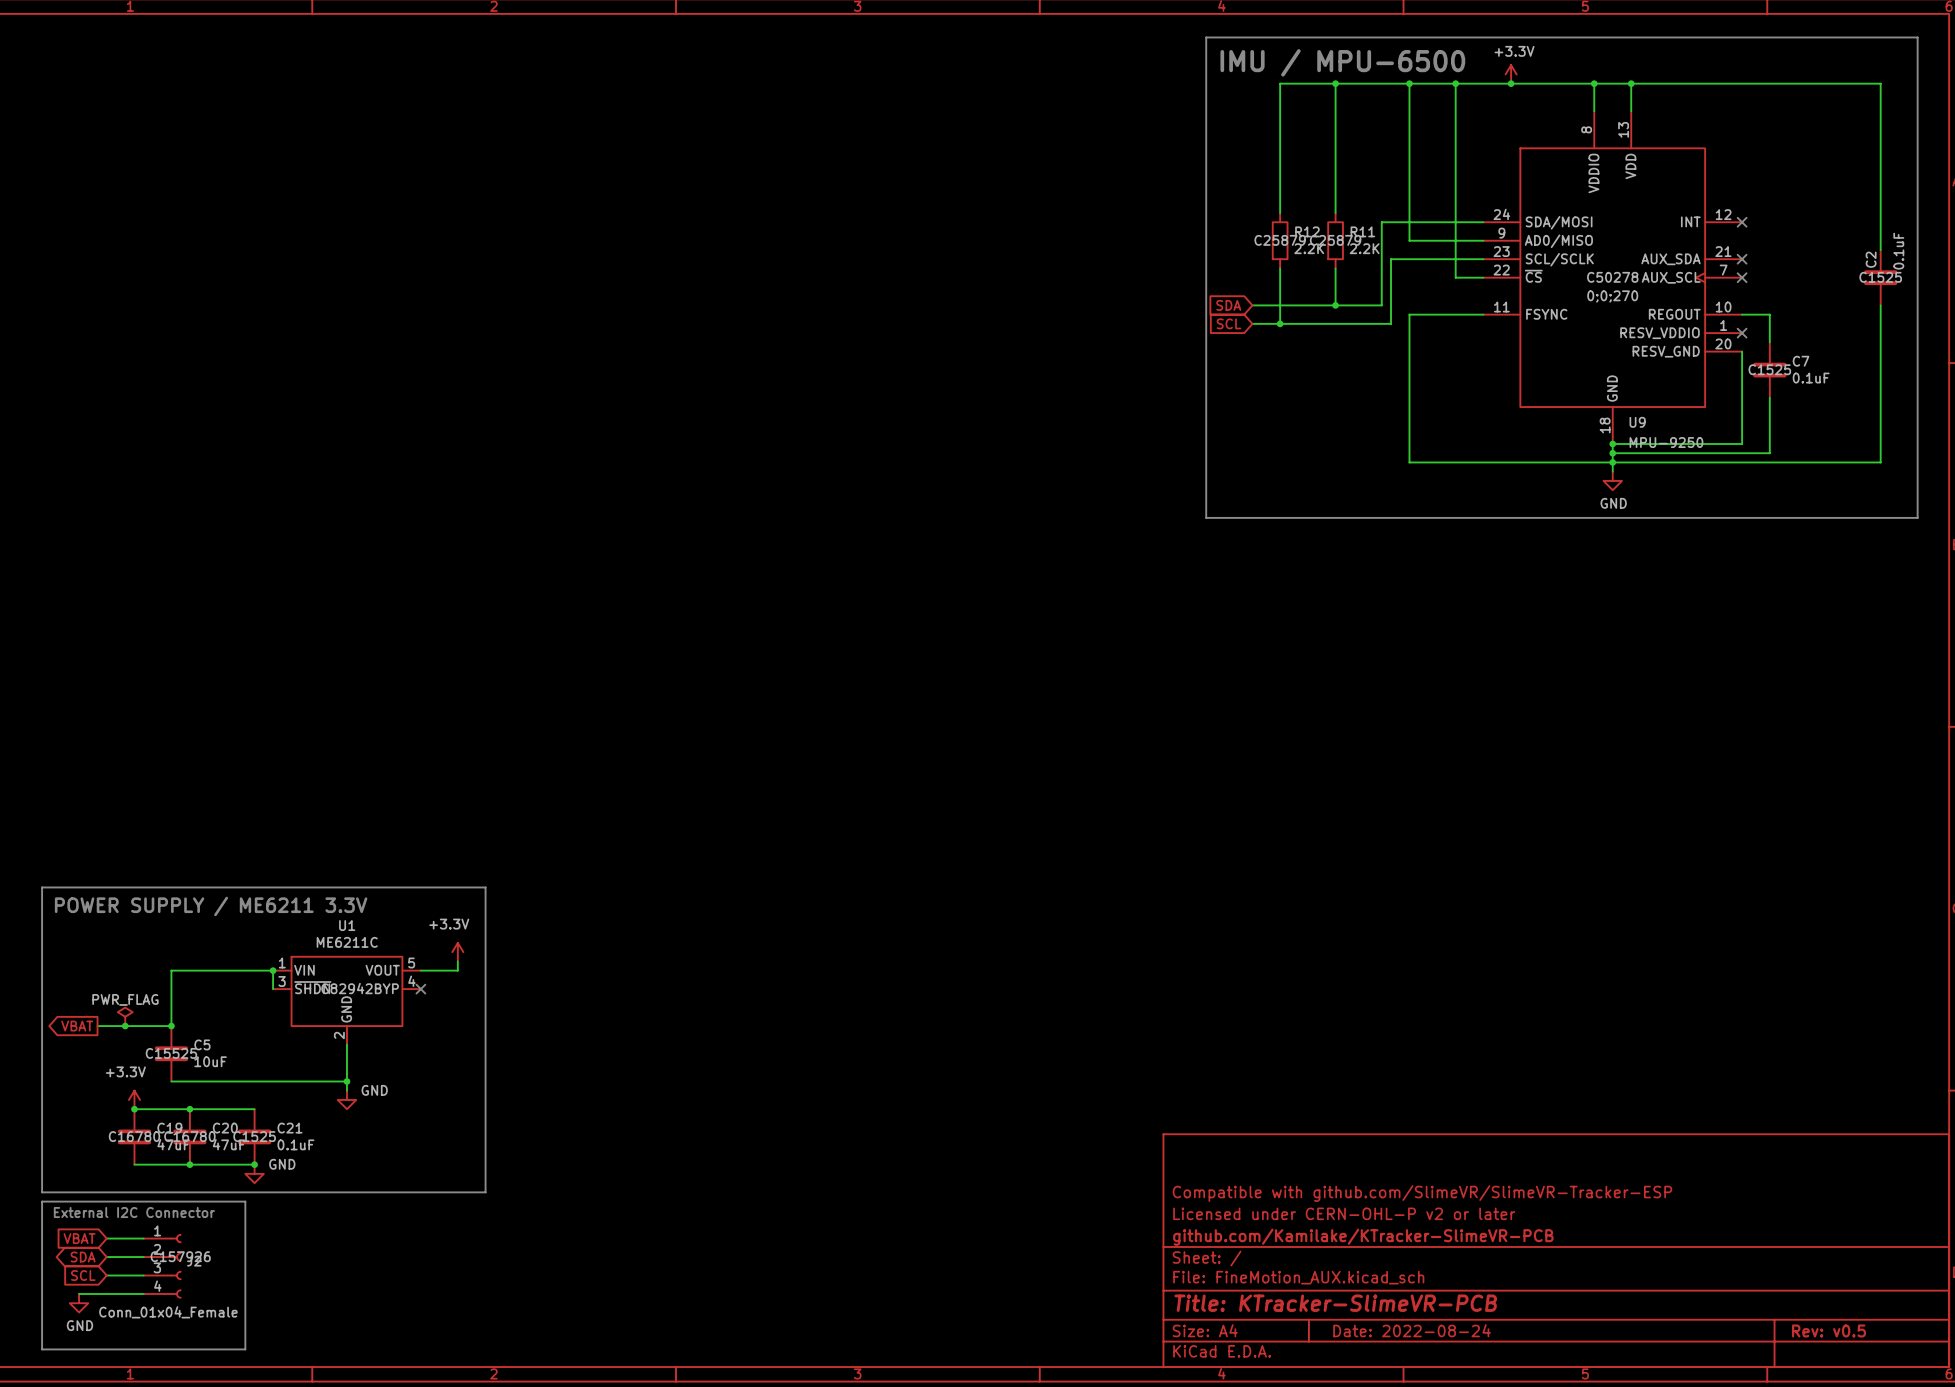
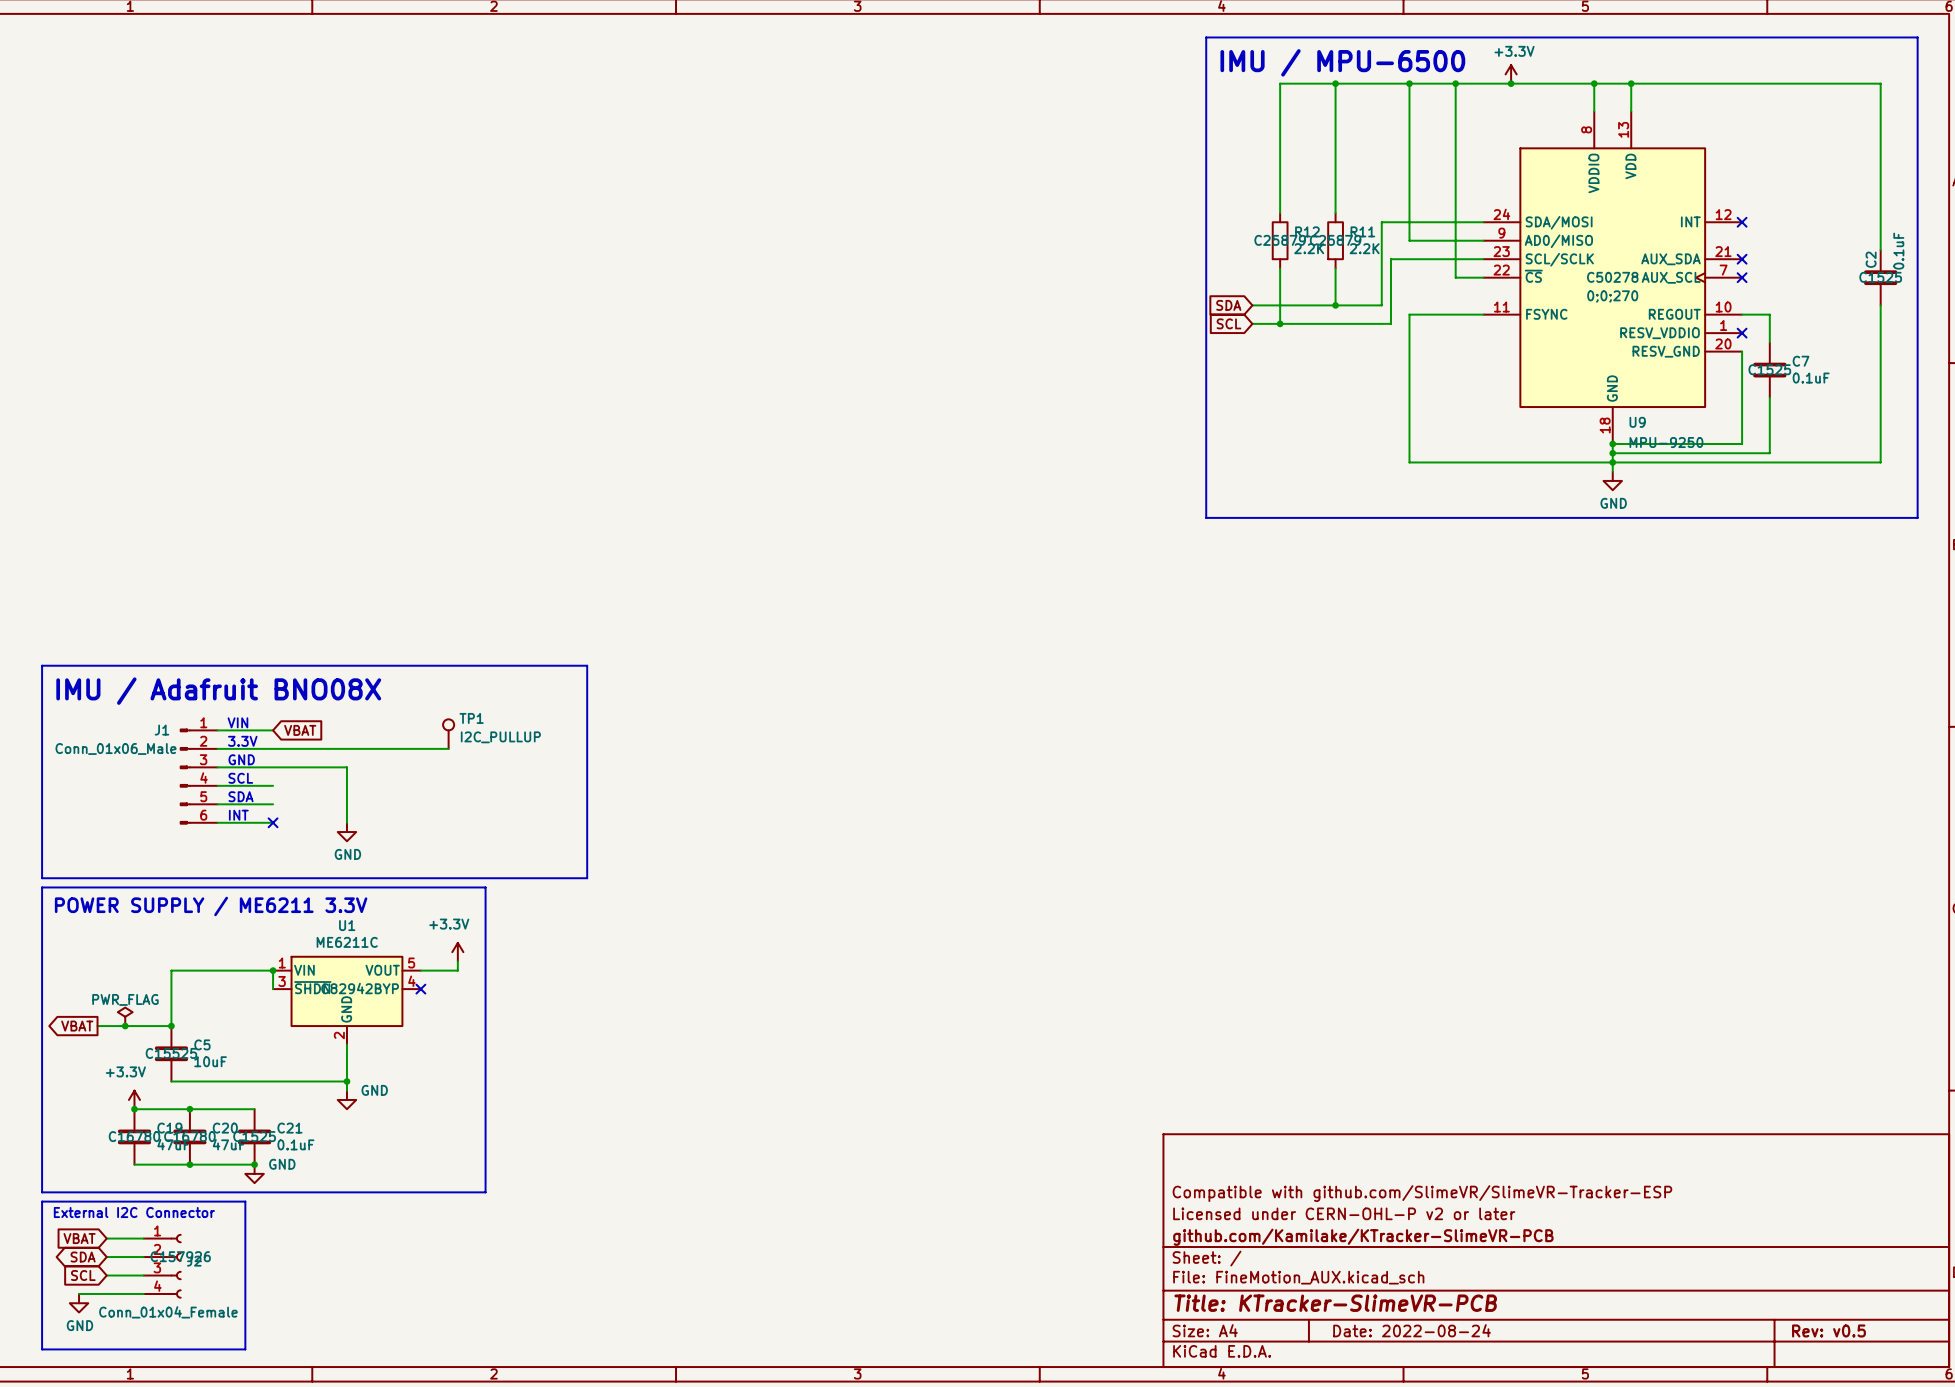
line: none -> (42, 665) (42, 878) (587, 878) (587, 665) (42, 665)
text: none -> IMU / Adafruit BNO08X (218, 691)
text: none -> VIN (237, 722)
wire: none -> (217, 730) (273, 730)
global label: none -> VBAT (300, 730)
TP1: none -> I2C_PULLUP (448, 734)
text: none -> 3.3V (242, 741)
wire: none -> (217, 748) (448, 748)
text: none -> GND (241, 759)
wire: none -> (217, 767) (346, 767) (346, 822)
J1: none -> Conn_01x06_Male (198, 776)
text: none -> SCL (240, 778)
wire: none -> (217, 785) (273, 785)
text: none -> SDA (241, 796)
wire: none -> (217, 804) (273, 804)
text: none -> INT (238, 815)
wire: none -> (217, 822) (273, 822)
no-connect mark: none -> (273, 822)
power symbol: none -> GND (346, 832)

